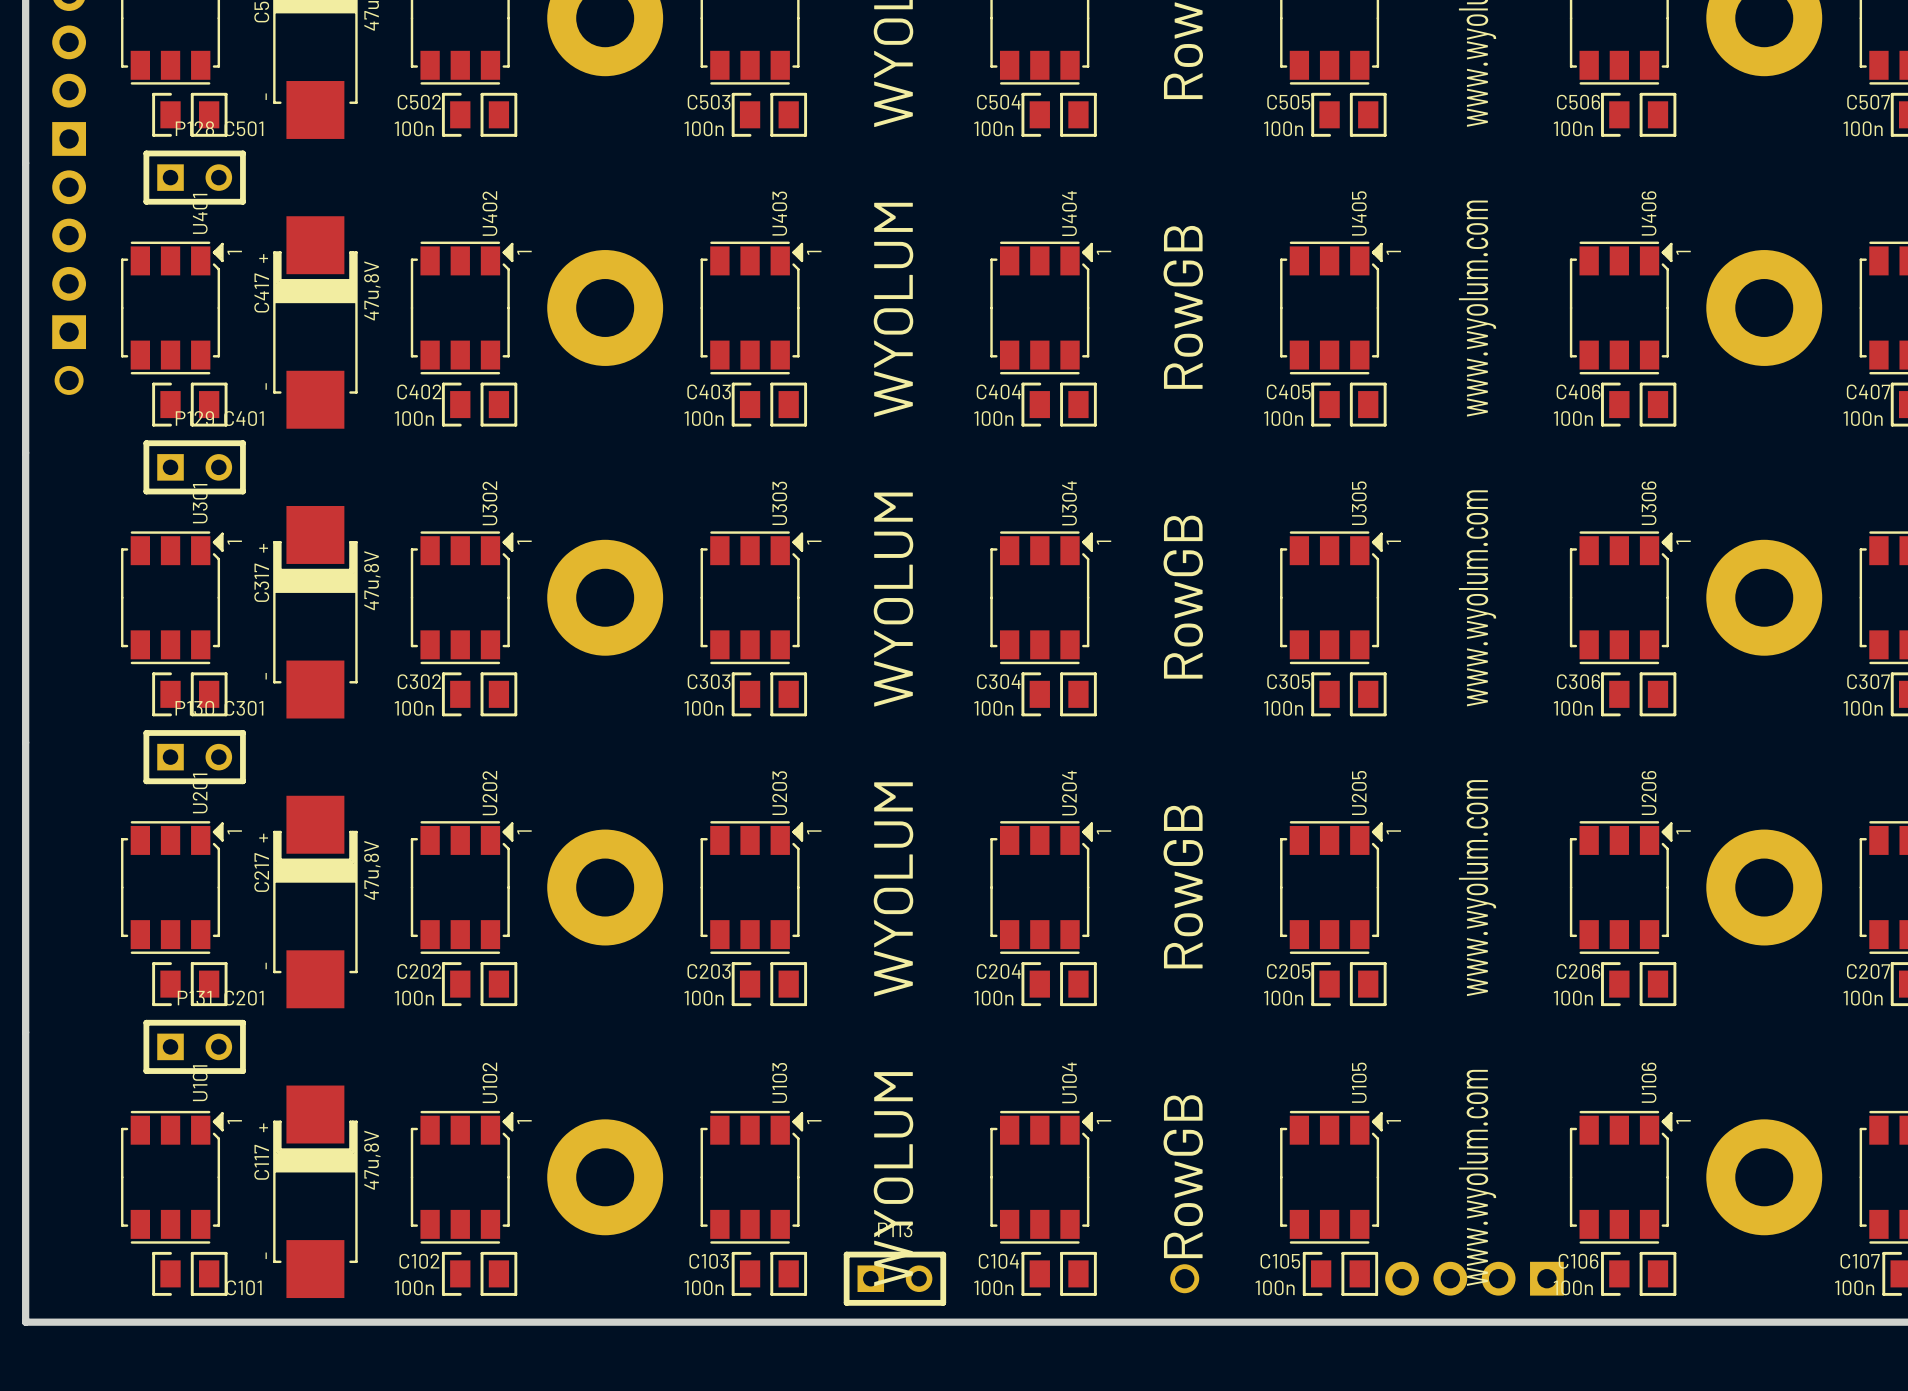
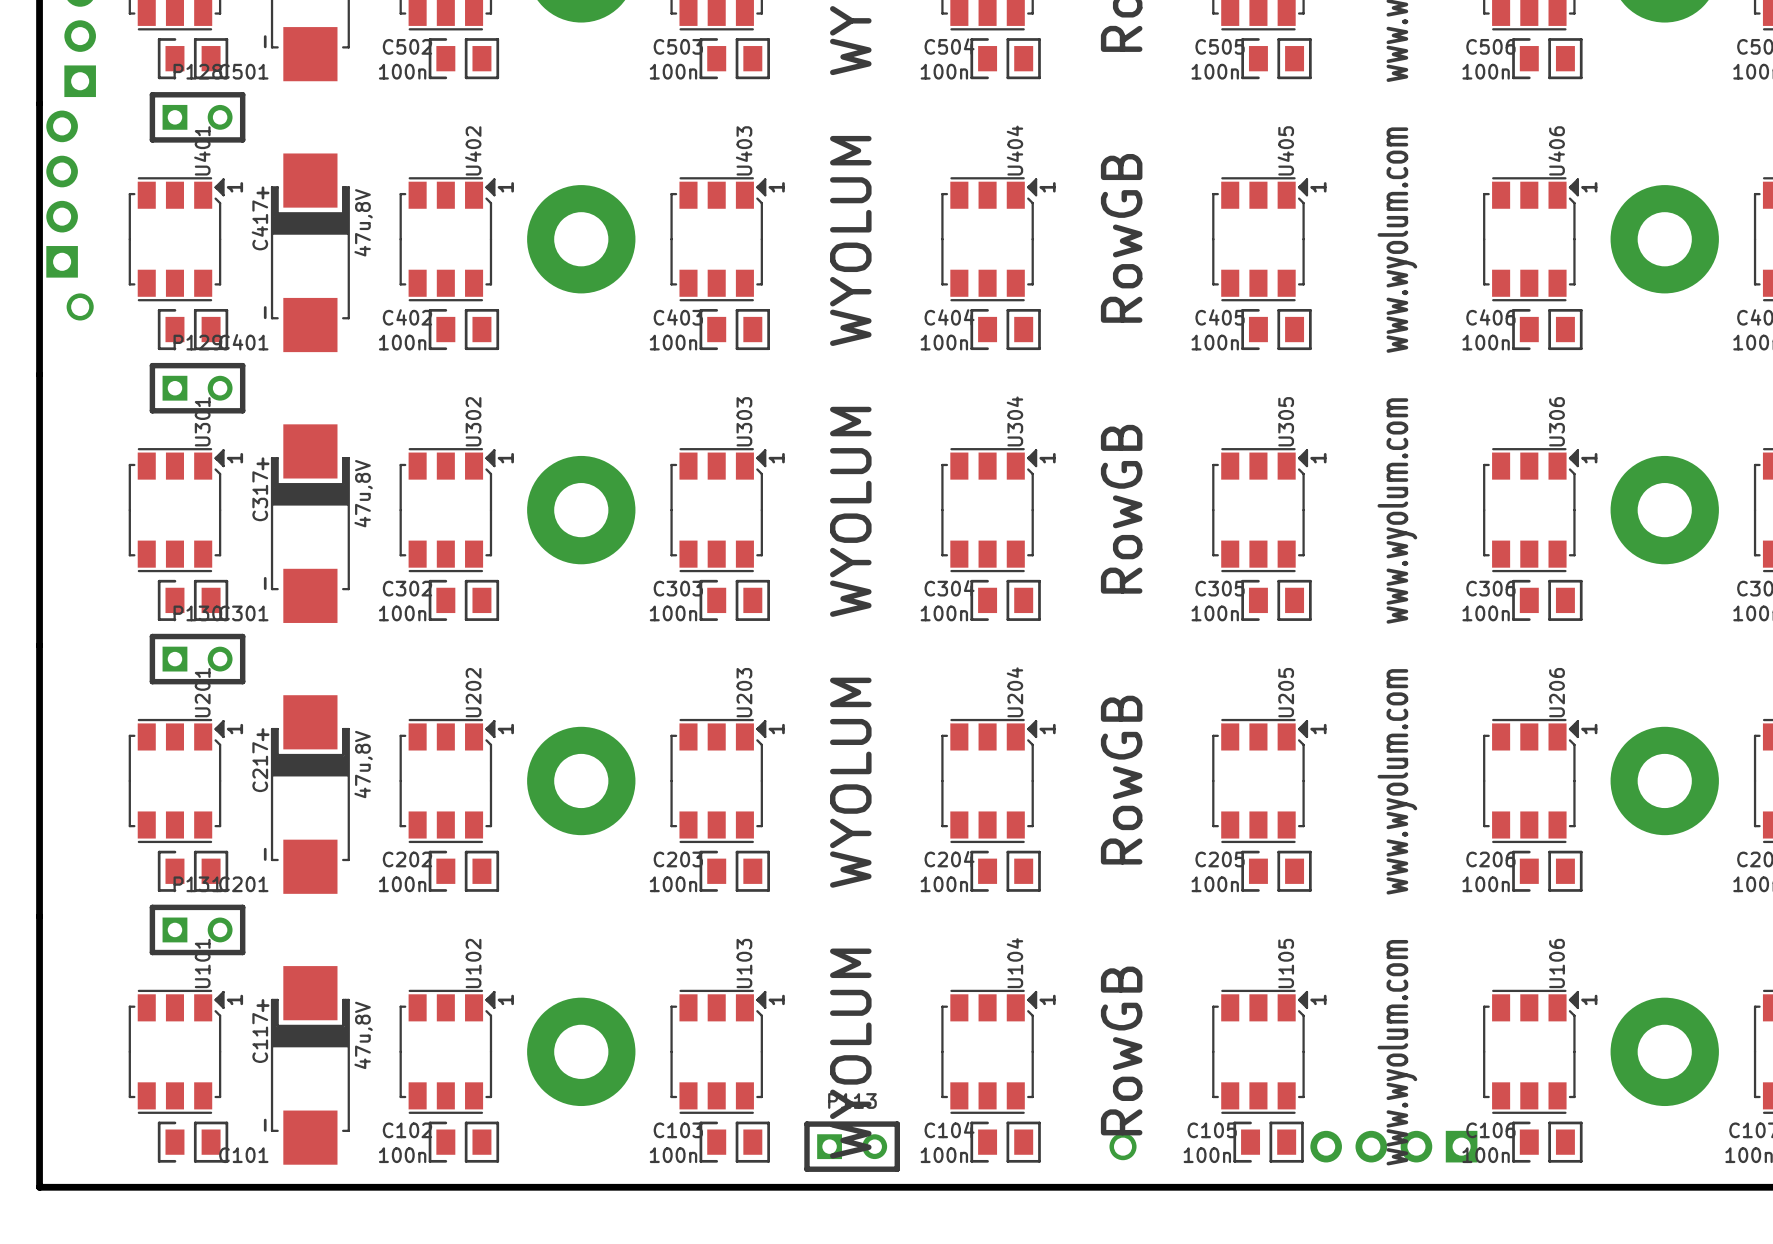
part position: (69, 259) -> (62, 194)

